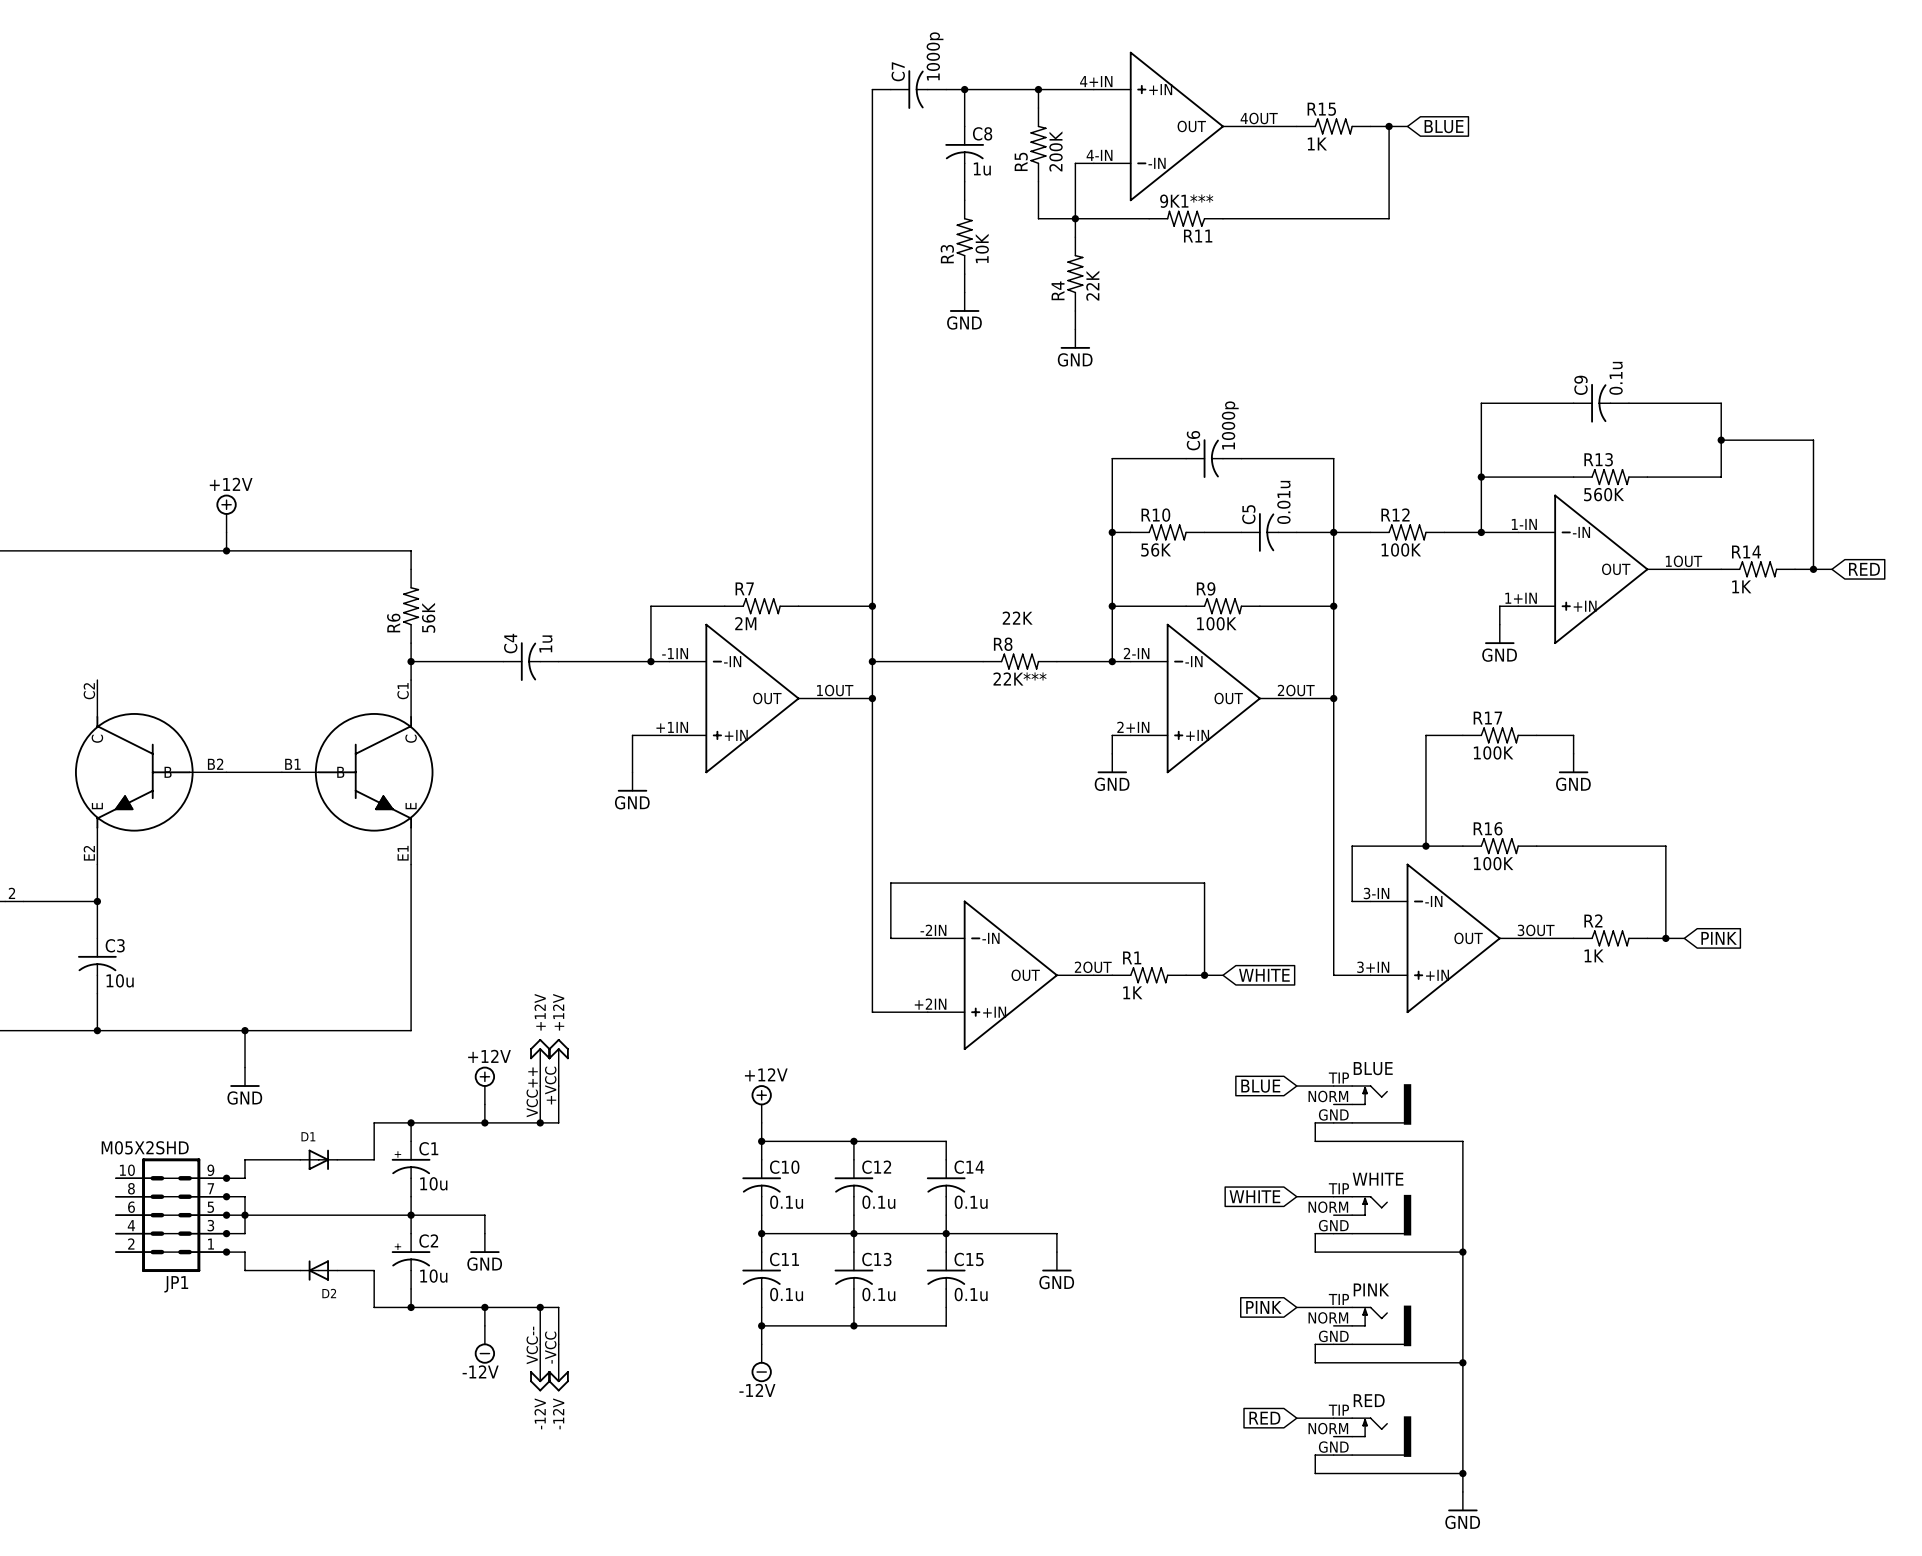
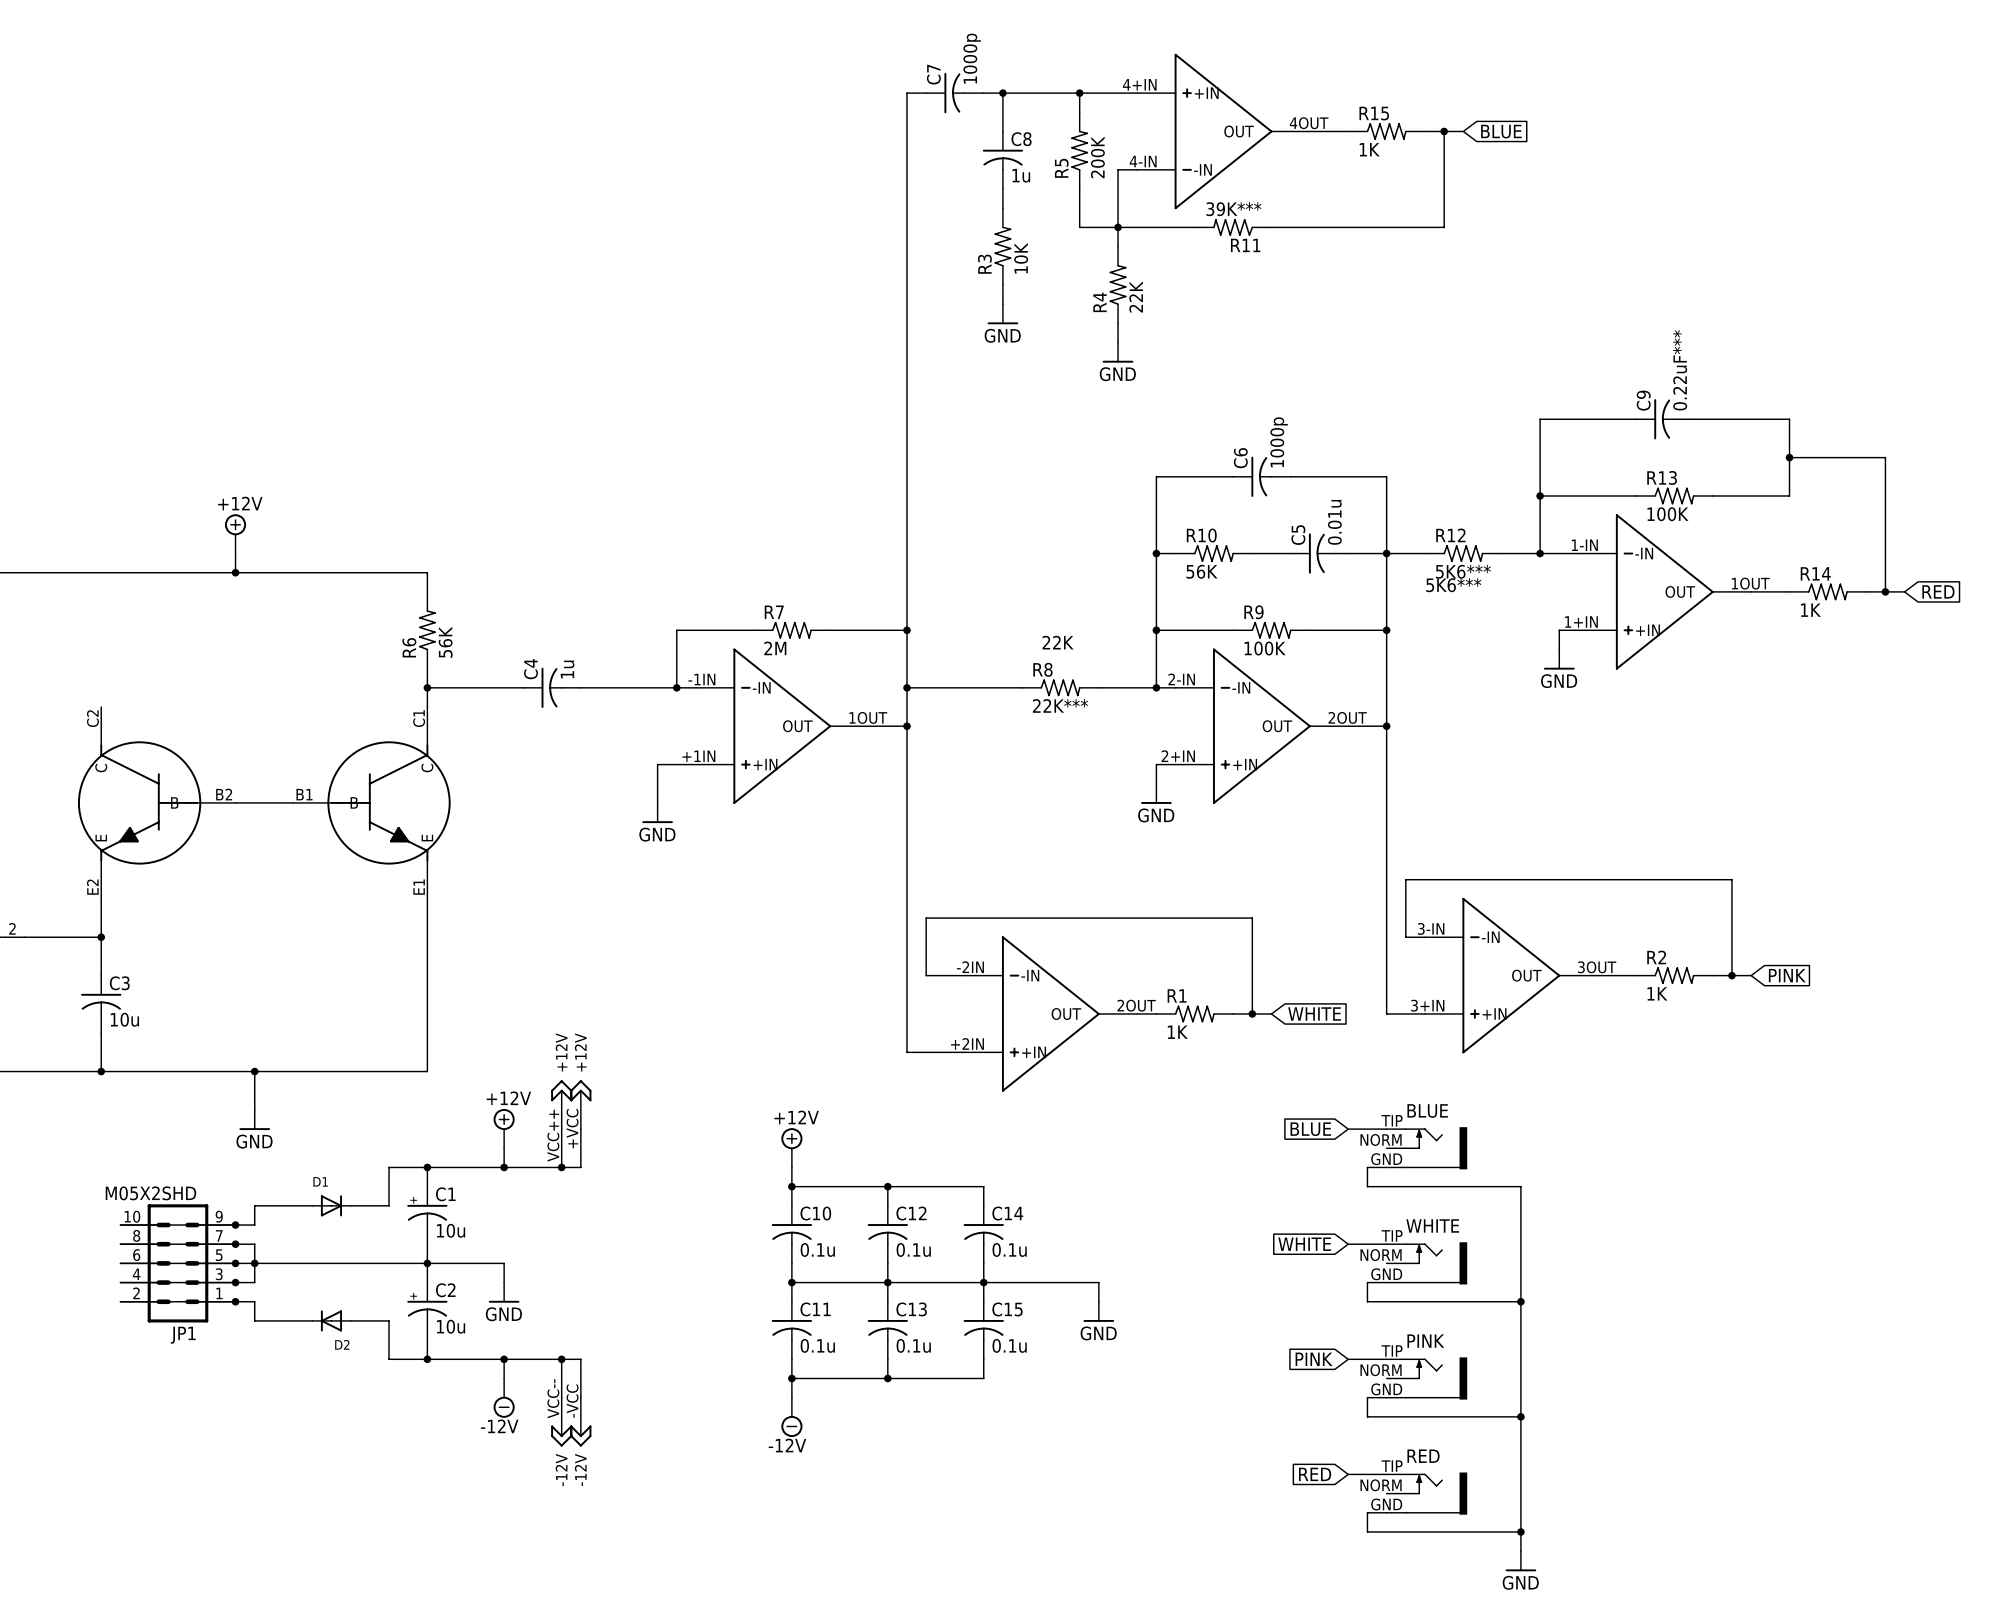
R11 value: 9K1*** (1186, 201) -> 39K*** (1233, 209)
C9 value: 0.1u (1616, 378) -> 0.22uF*** (1680, 370)
R13 value: 560K (1604, 494) -> 100K (1667, 514)
R12 value: 100K (1401, 549) -> 5K6*** (1463, 571)
text: none -> 5K6*** (1453, 585)
wire: (1462, 735) (1425, 735) (1425, 846) -> none
R17: 100K (1499, 735) -> none
wire: (1536, 735) (1573, 735) (1573, 753) -> none
power symbol: GND (1573, 763) -> none
junction: (1425, 846) -> none
R16: 100K (1499, 846) -> none

